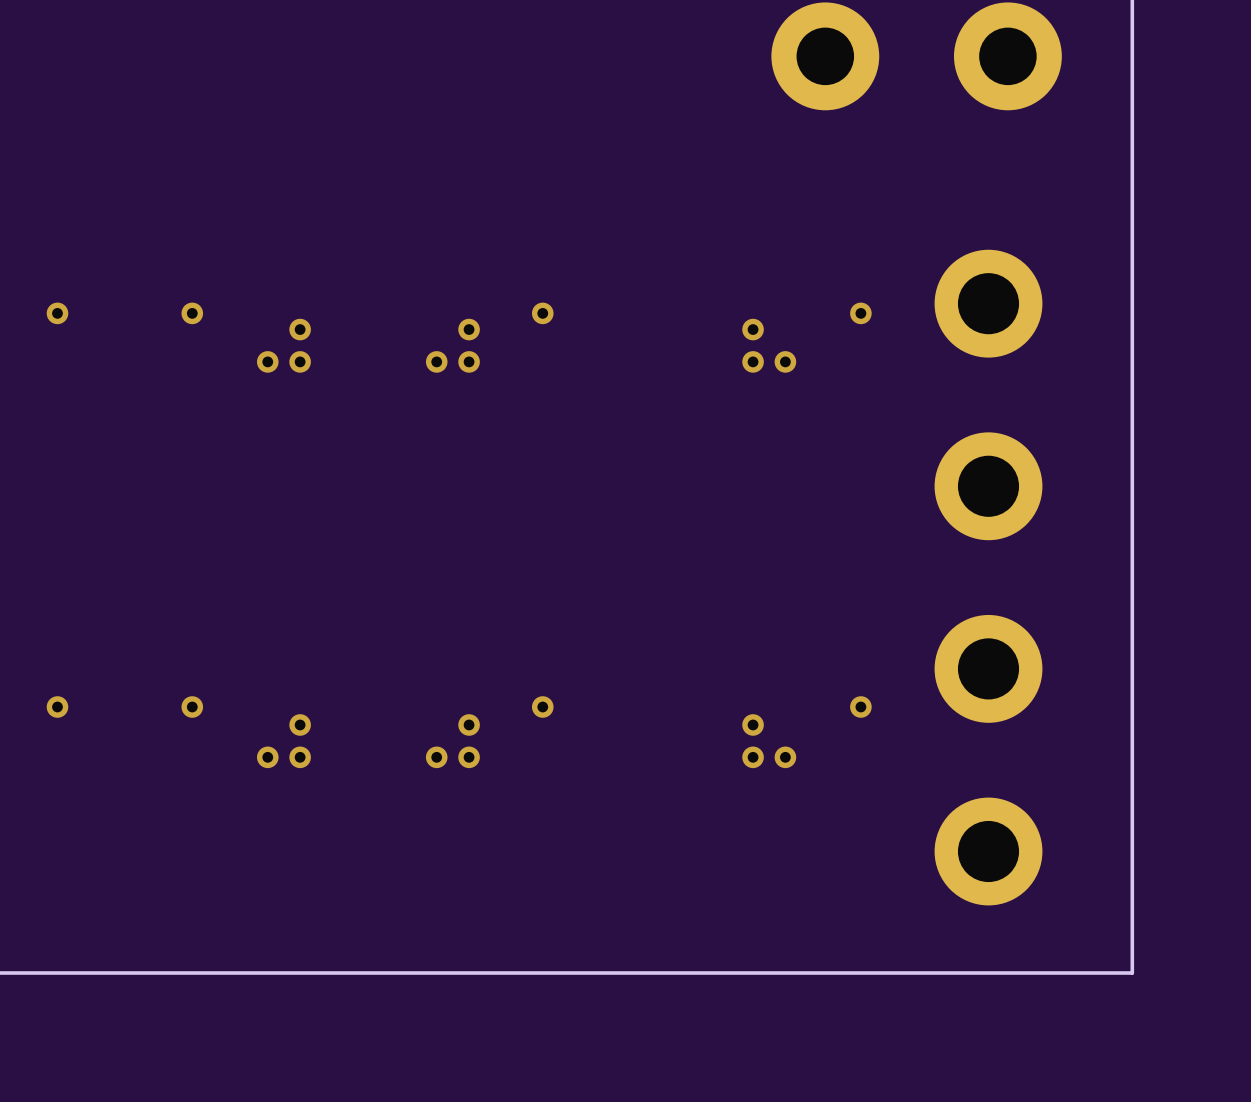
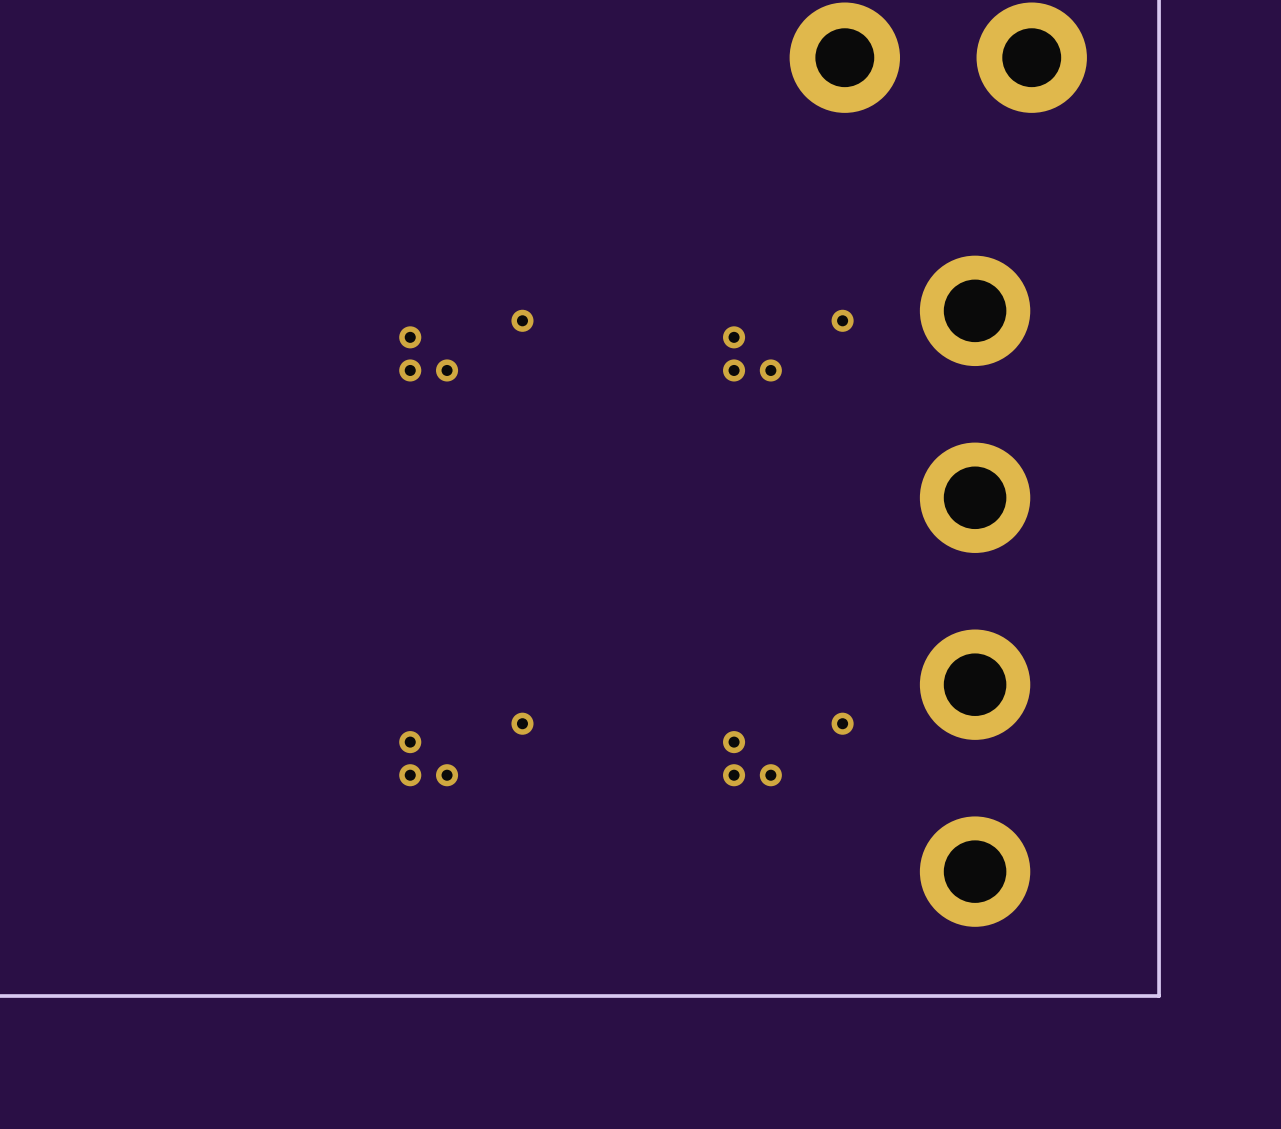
via: (57, 313) -> none
via: (192, 313) -> none
via: none -> (522, 320)
via: (542, 313) -> none
via: none -> (842, 320)
via: (860, 313) -> none
via: (300, 329) -> none
via: none -> (410, 337)
via: (469, 329) -> none
via: none -> (734, 337)
via: (753, 329) -> none
via: (267, 361) -> none
via: (300, 361) -> none
via: none -> (410, 370)
via: (469, 361) -> none
via: none -> (734, 370)
via: (785, 361) -> none
part position: (988, 577) -> (975, 591)
via: (57, 707) -> none
via: (192, 707) -> none
via: none -> (522, 723)
via: (542, 707) -> none
via: none -> (842, 723)
via: (860, 707) -> none
via: (300, 724) -> none
via: none -> (410, 742)
via: (469, 724) -> none
via: none -> (734, 742)
via: (753, 724) -> none
via: (267, 757) -> none
via: (300, 757) -> none
via: none -> (410, 775)
via: (469, 757) -> none
via: none -> (734, 775)
via: (785, 757) -> none

